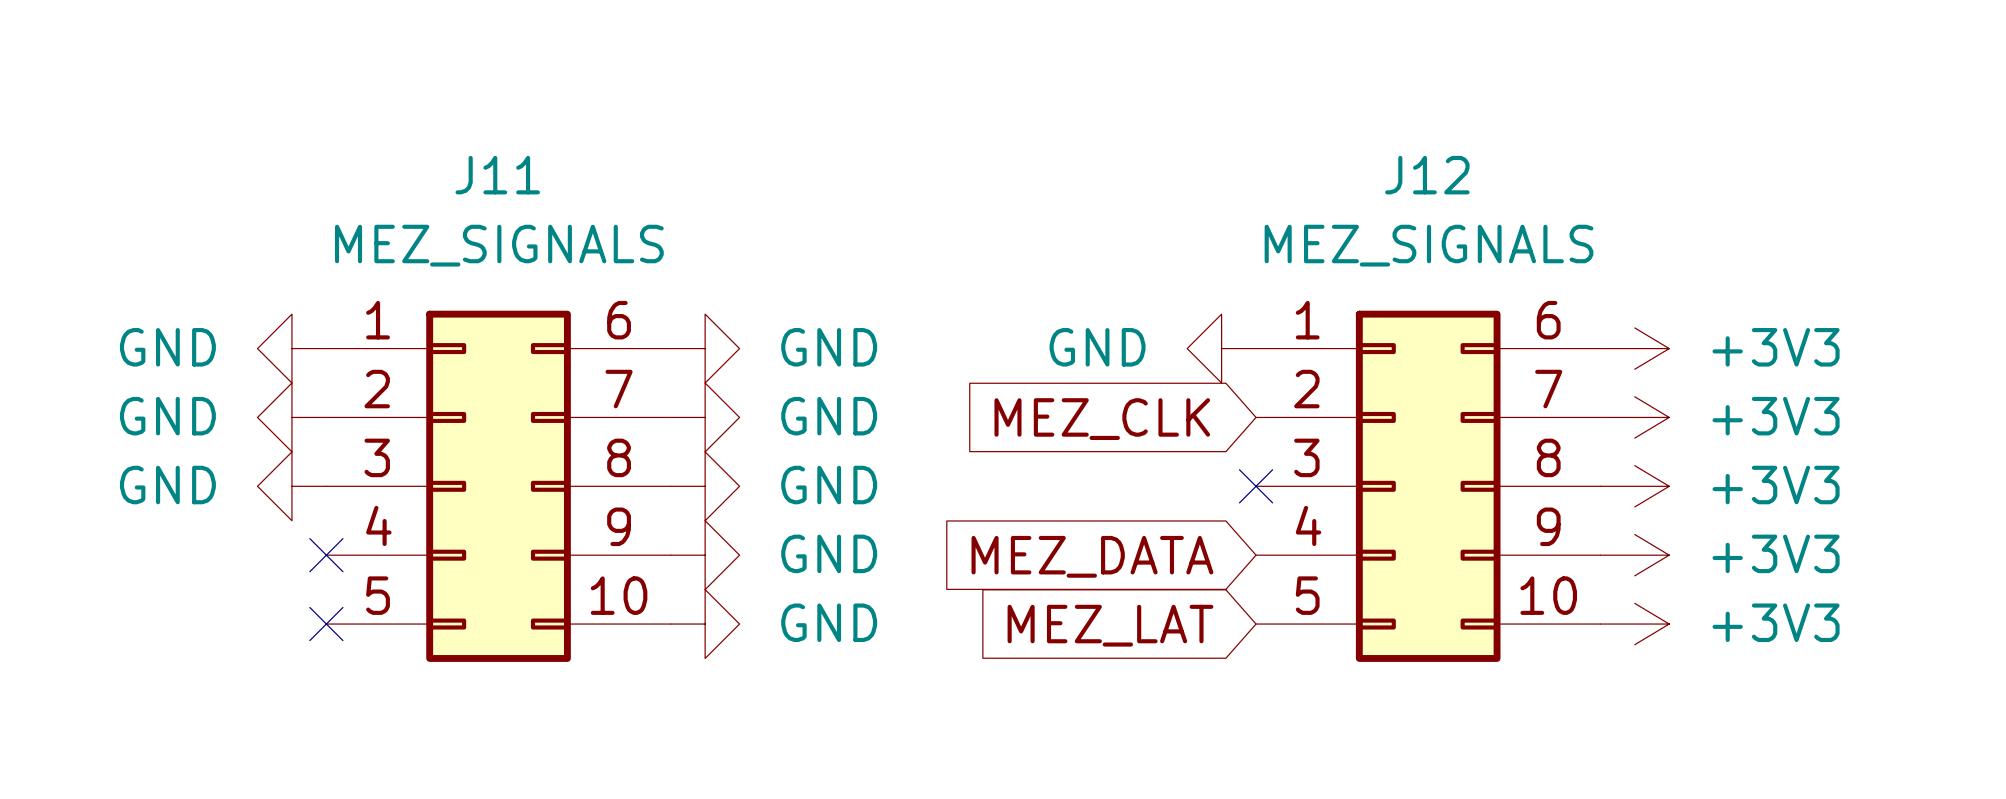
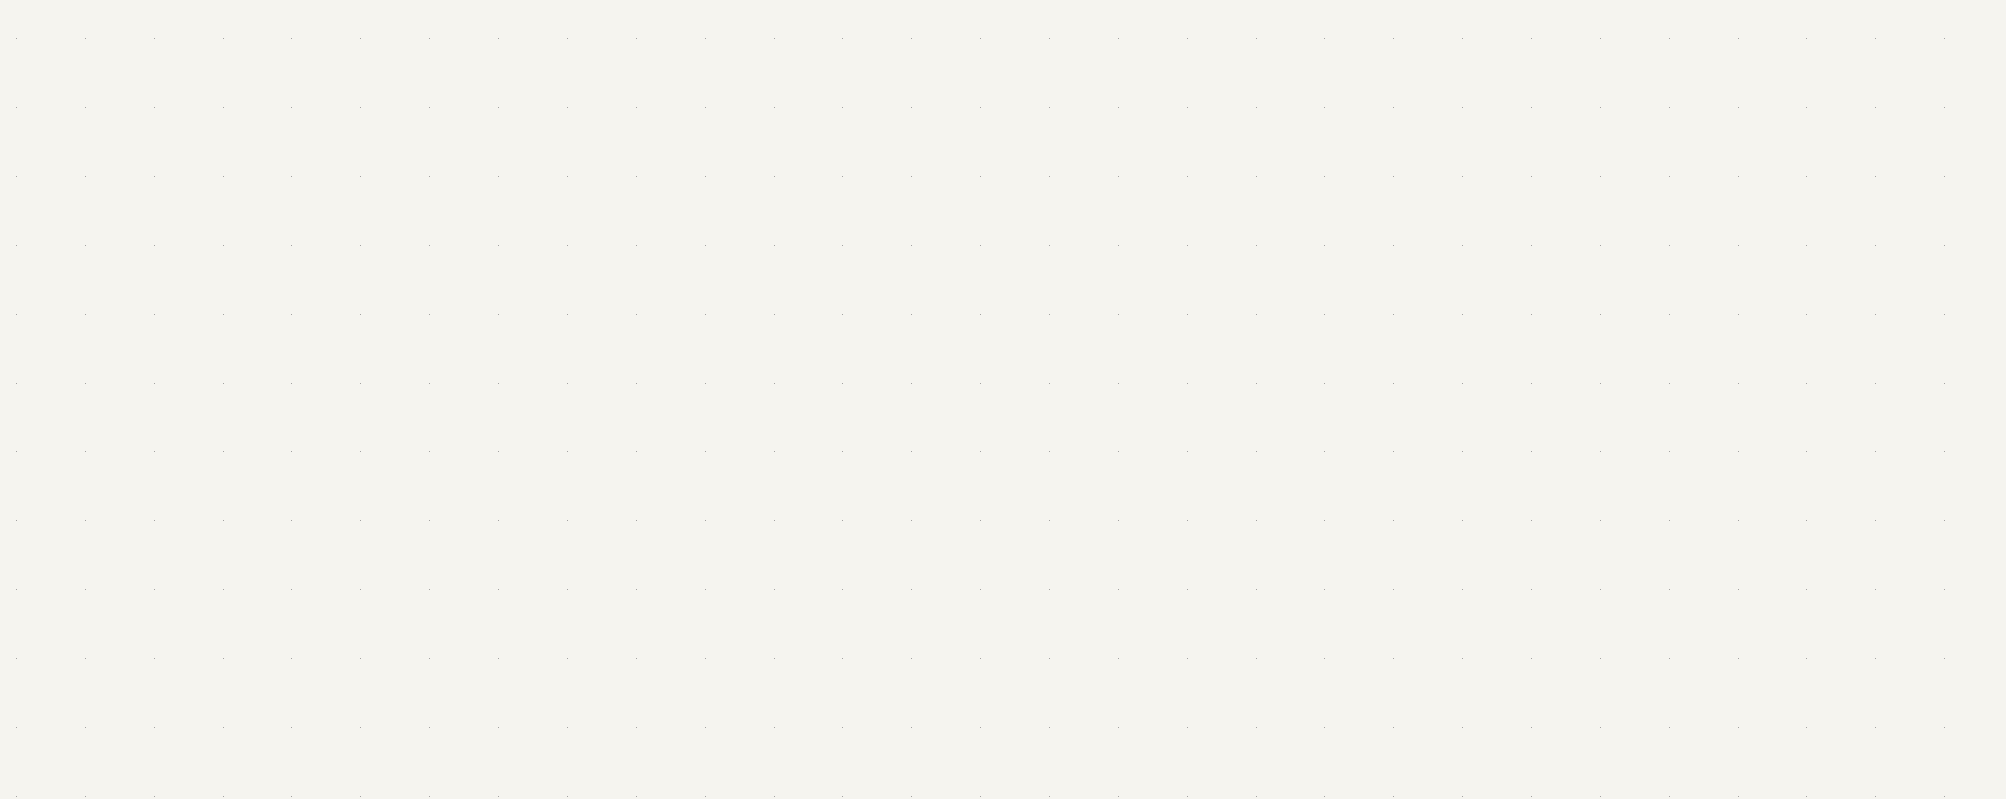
power symbol: GND (291, 348) -> none
power symbol: GND (705, 348) -> none
power symbol: GND (1221, 348) -> none
power symbol: +3V3 (1634, 348) -> none
power symbol: GND (291, 417) -> none
power symbol: GND (705, 417) -> none
power symbol: +3V3 (1634, 417) -> none
global label: MEZ_CLK (1102, 419) -> none
power symbol: GND (291, 486) -> none
J11: MEZ_SIGNALS (498, 486) -> none
power symbol: GND (705, 486) -> none
no-connect mark: (1256, 486) -> none
J12: MEZ_SIGNALS (1428, 486) -> none
power symbol: +3V3 (1634, 486) -> none
no-connect mark: (326, 555) -> none
power symbol: GND (705, 555) -> none
power symbol: +3V3 (1634, 555) -> none
global label: MEZ_DATA (1092, 556) -> none
no-connect mark: (326, 624) -> none
power symbol: GND (705, 624) -> none
power symbol: +3V3 (1634, 624) -> none
global label: MEZ_LAT (1110, 625) -> none

